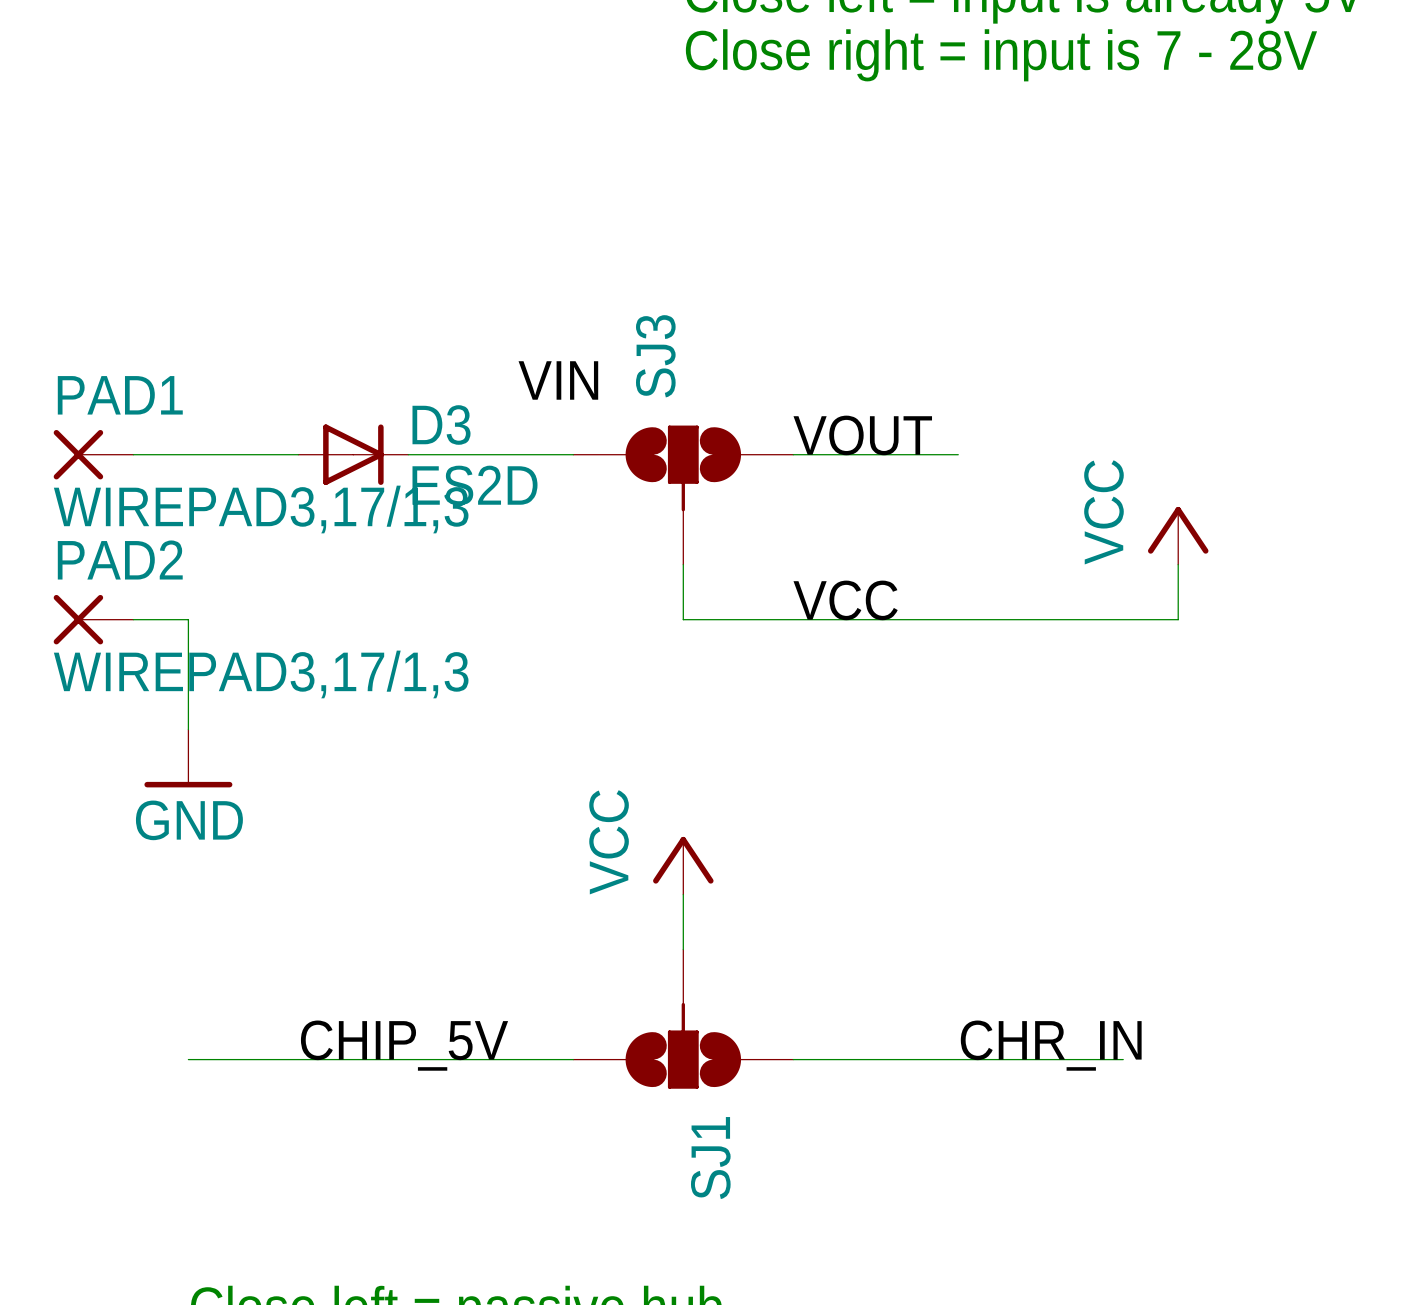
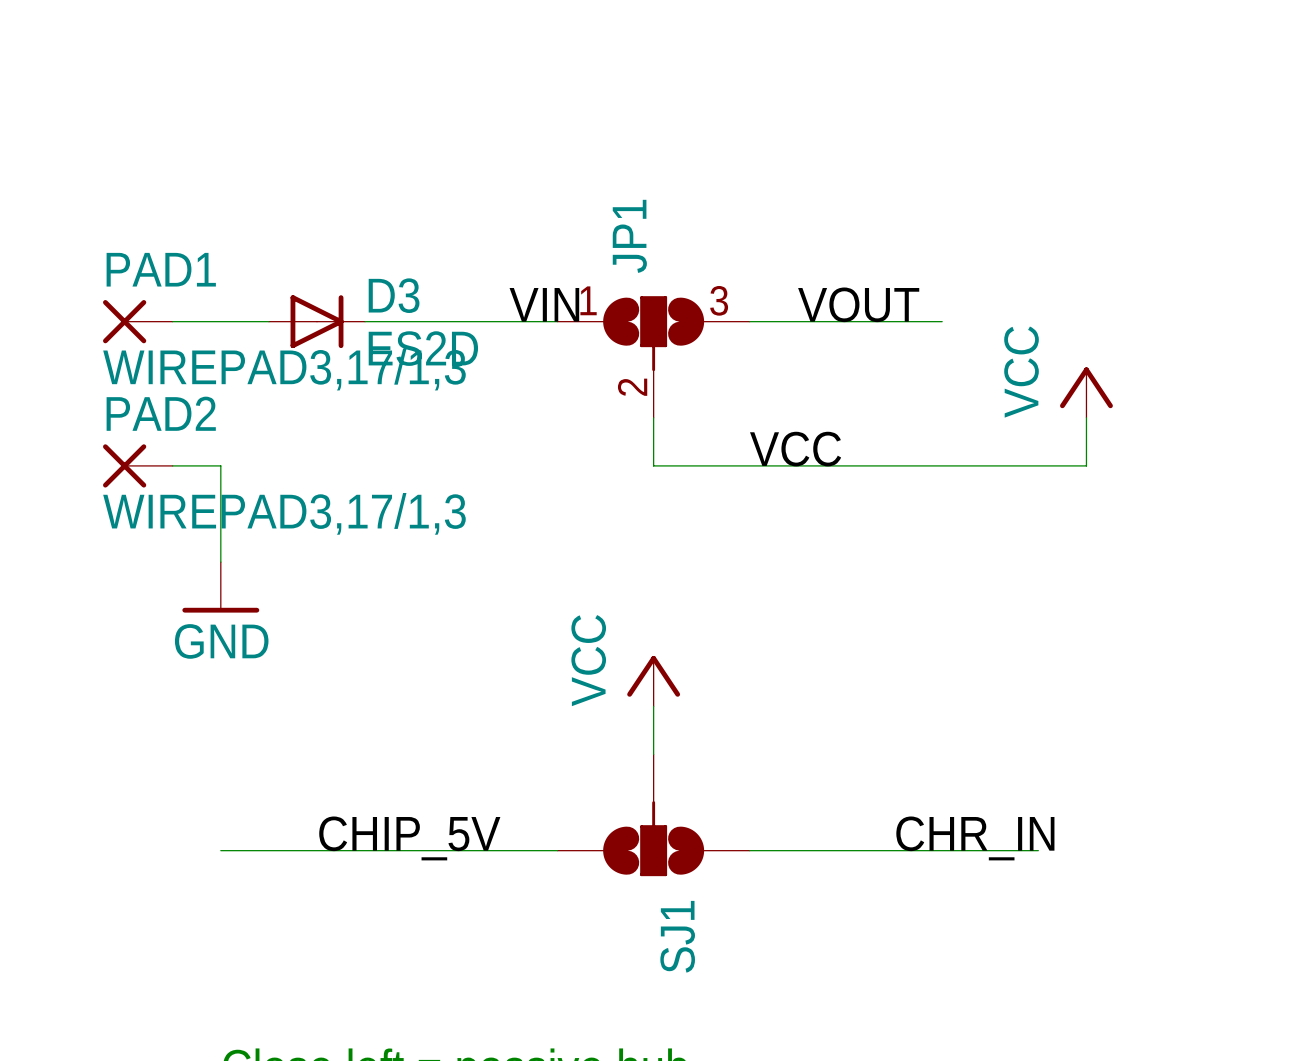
SJ3 name: SJ3 (655, 356) -> JP1 (629, 236)
label position: VIN (558, 380) -> VIN (544, 304)
SJ3 pin number: none -> 1 (588, 300)
SJ3 pin number: none -> 3 (719, 300)
label position: VOUT (862, 435) -> VOUT (858, 304)
D3 position: (353, 454) -> (317, 321)
wire: none -> (894, 321) (942, 321)
SJ3 pin number: none -> 2 (632, 387)

